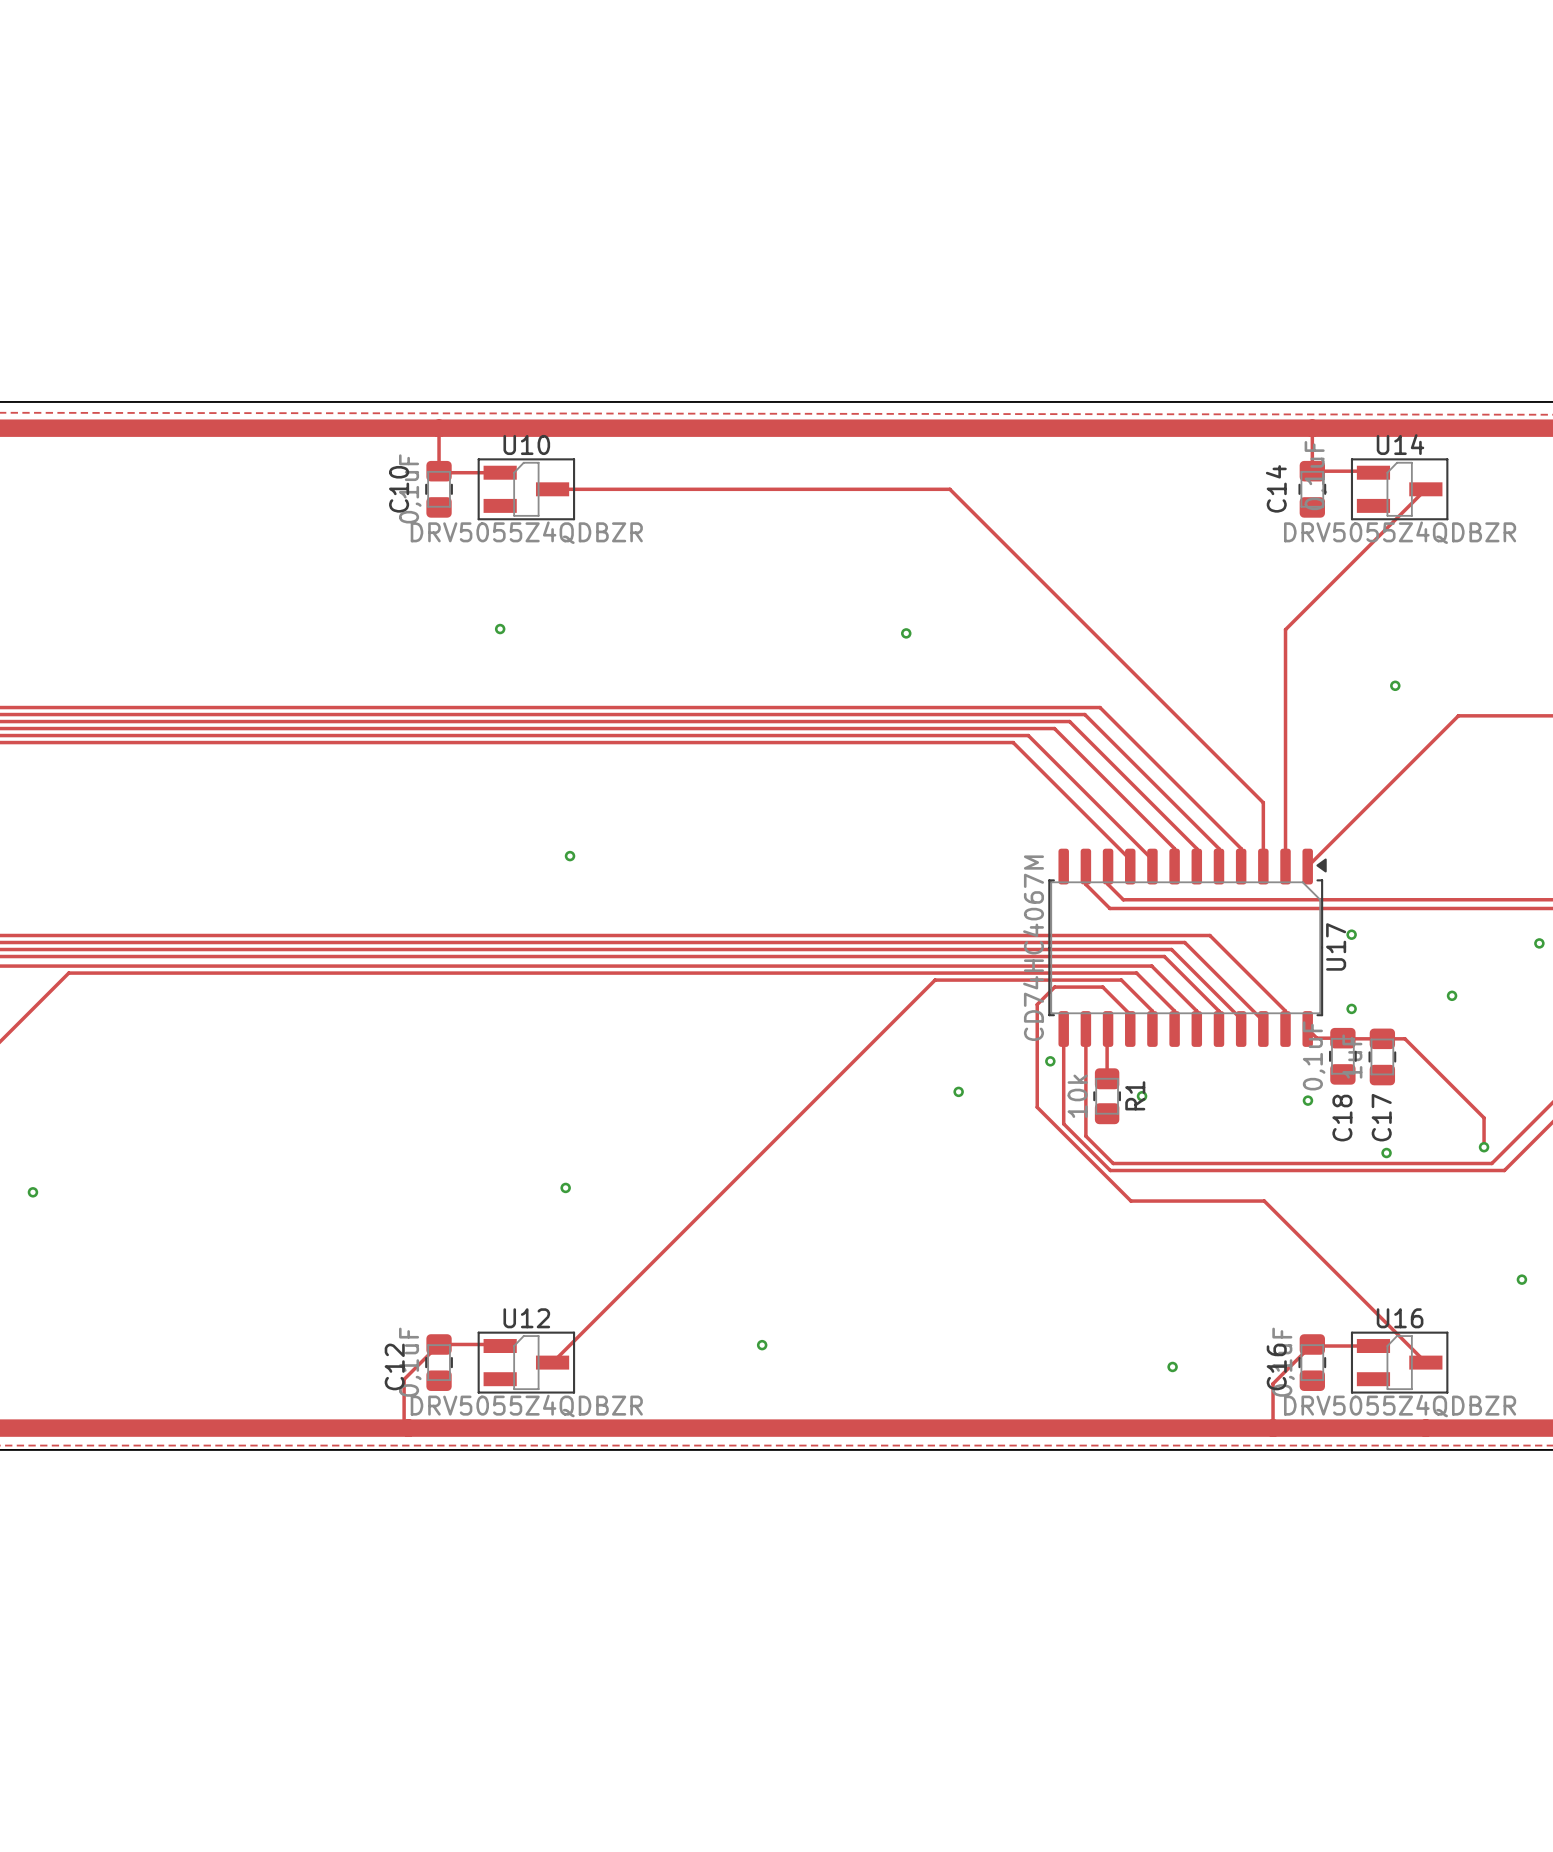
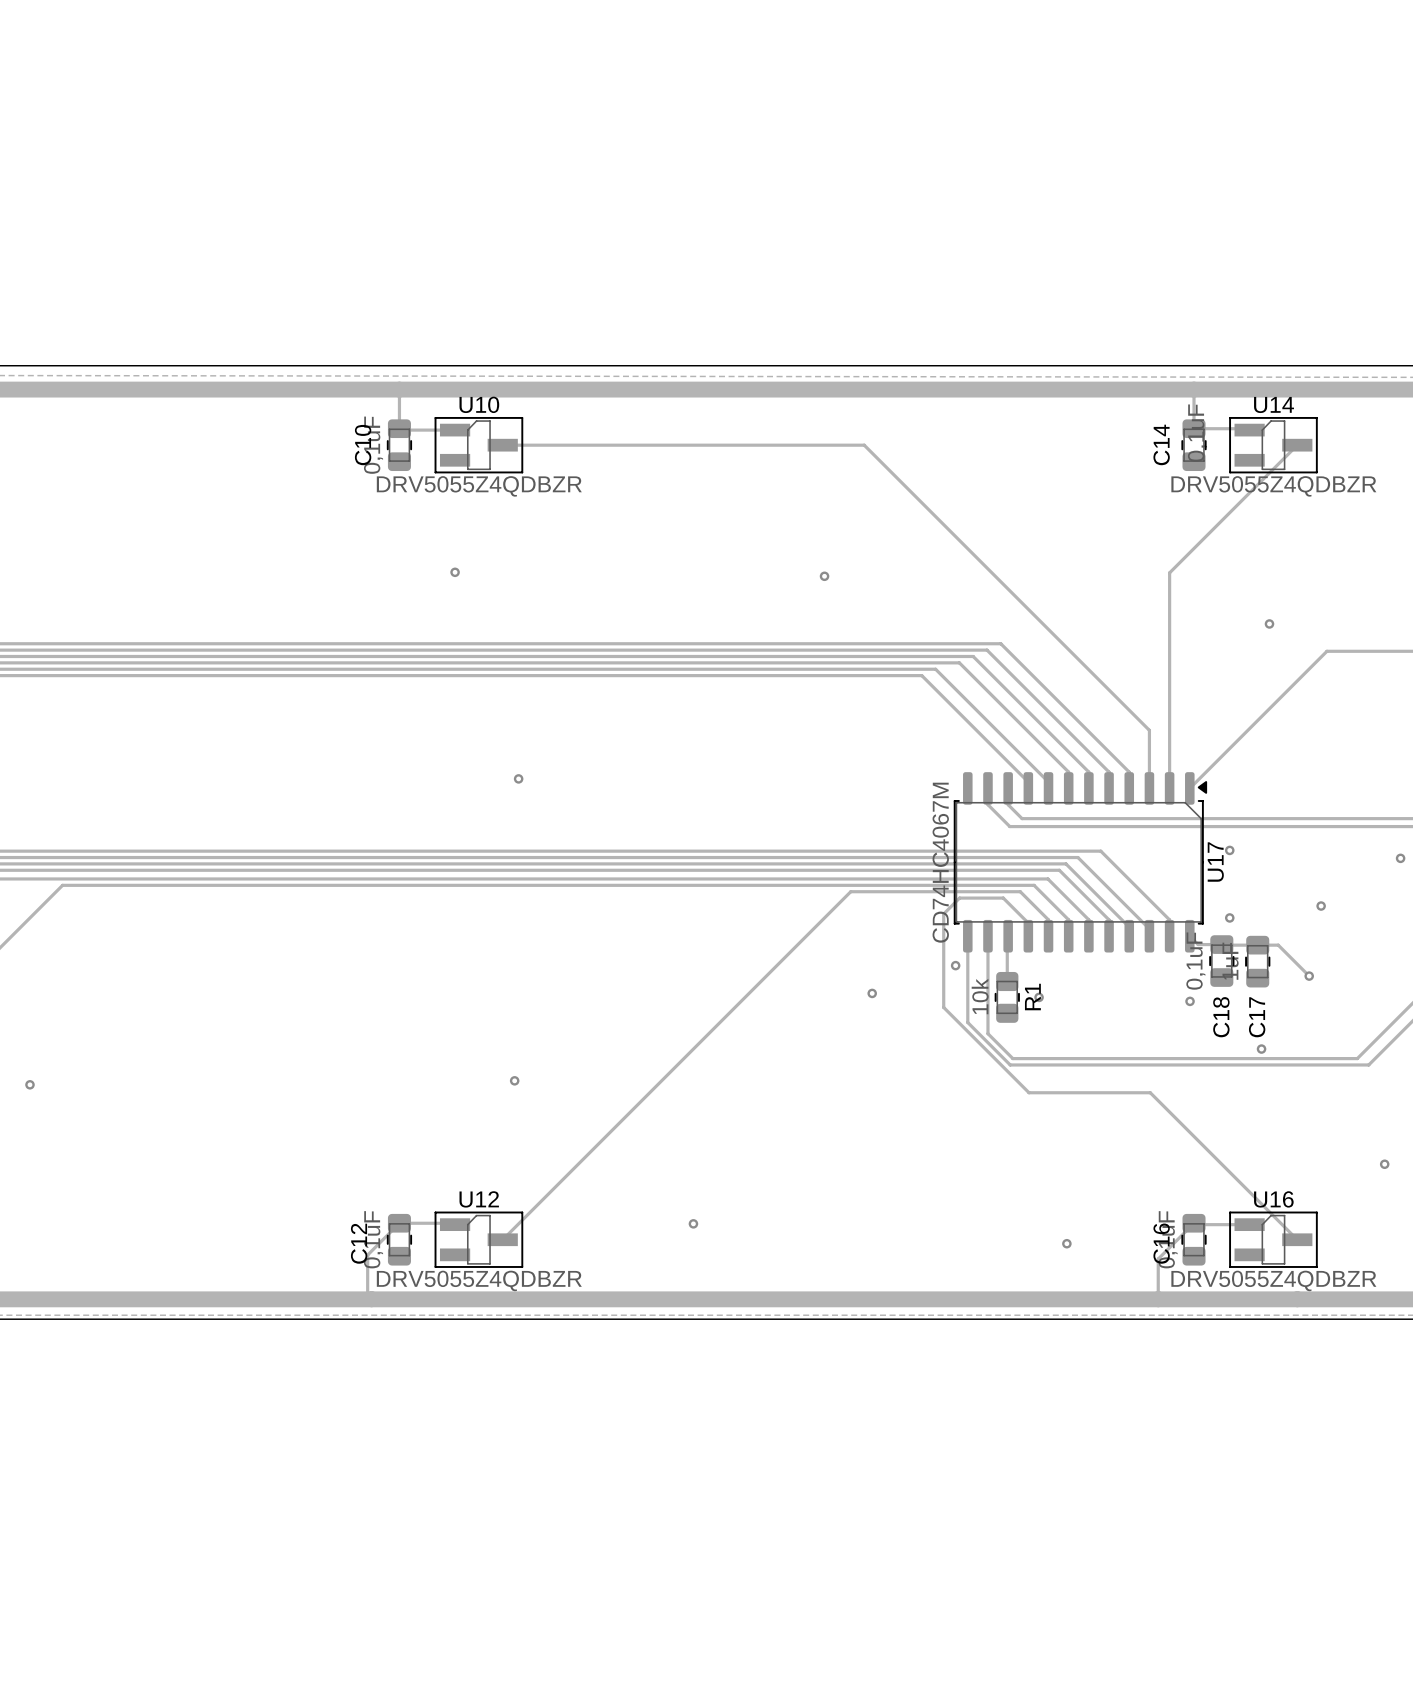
track: (1438, 1072) (1484, 1117) (1484, 1147) -> none
via position: (1484, 1147) -> (1309, 976)

